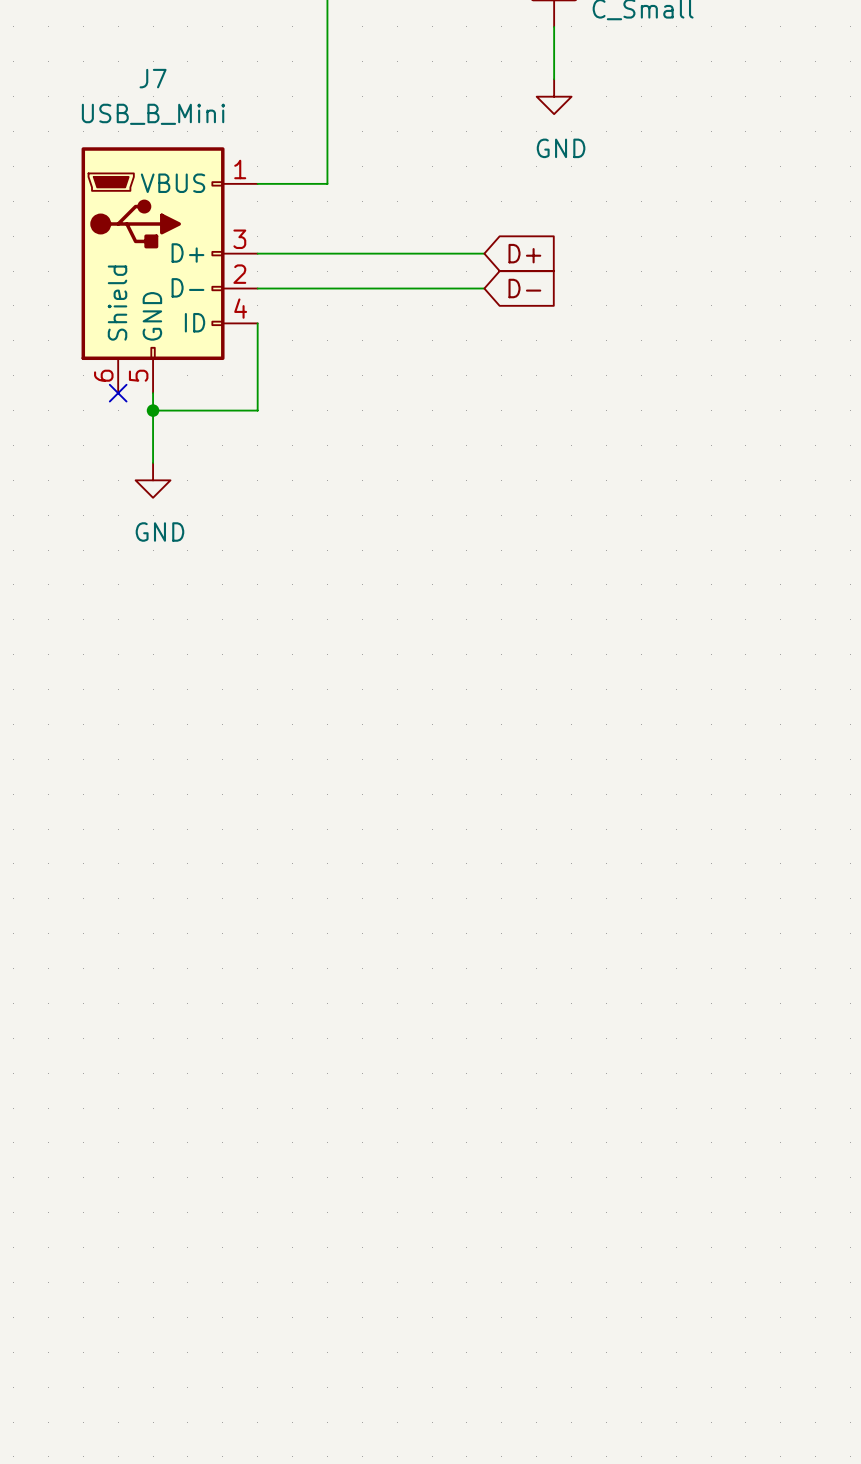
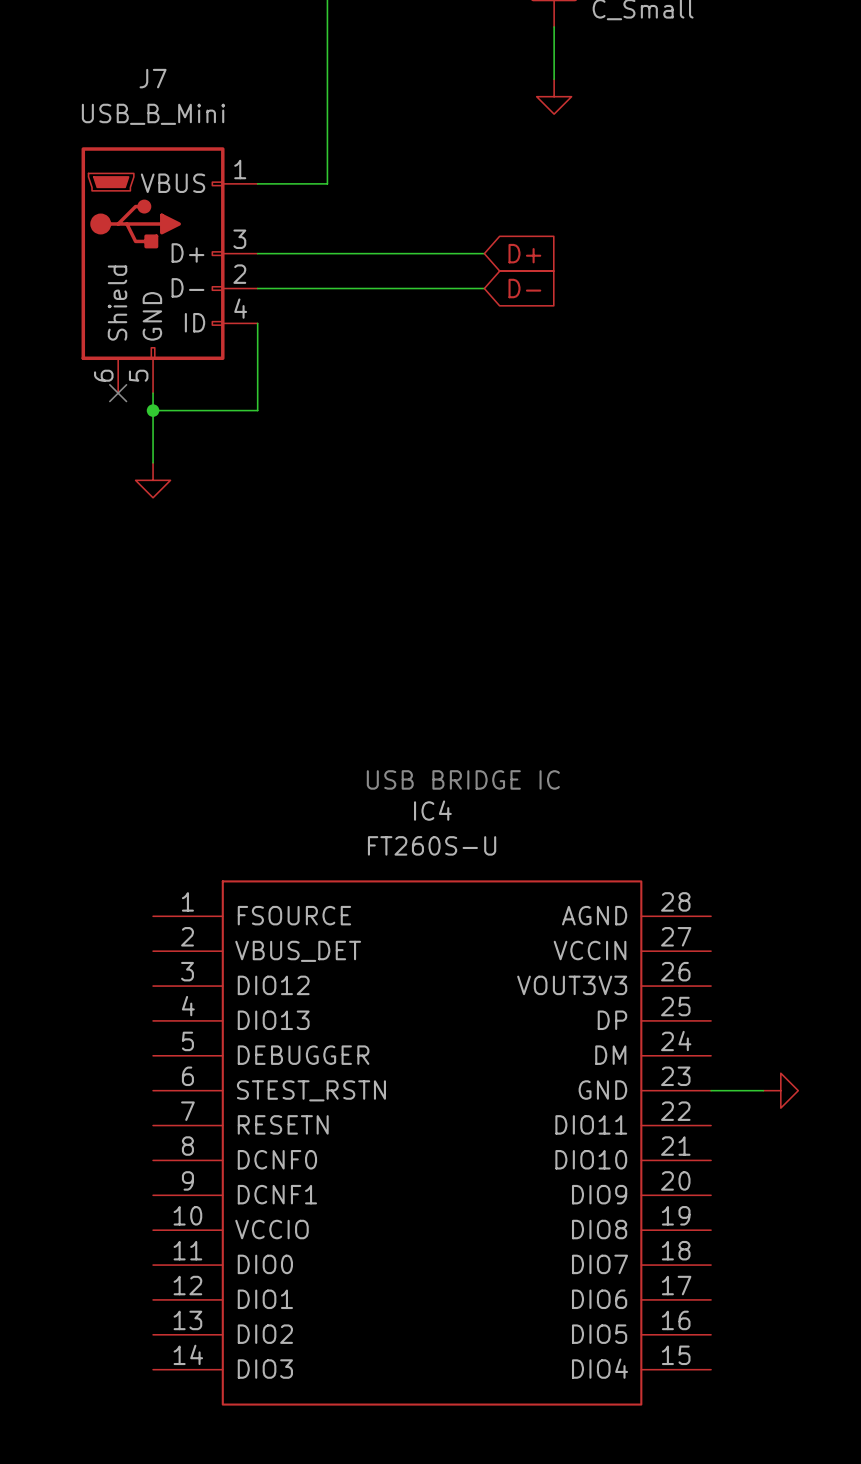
power symbol text: GND (561, 148) -> none
power symbol text: GND (159, 532) -> none
text: none -> USB BRIDGE IC (463, 779)
wire: none -> (711, 1090) (763, 1090)
power symbol: none -> (780, 1090)
IC4: none -> FT260S-U (432, 1142)

